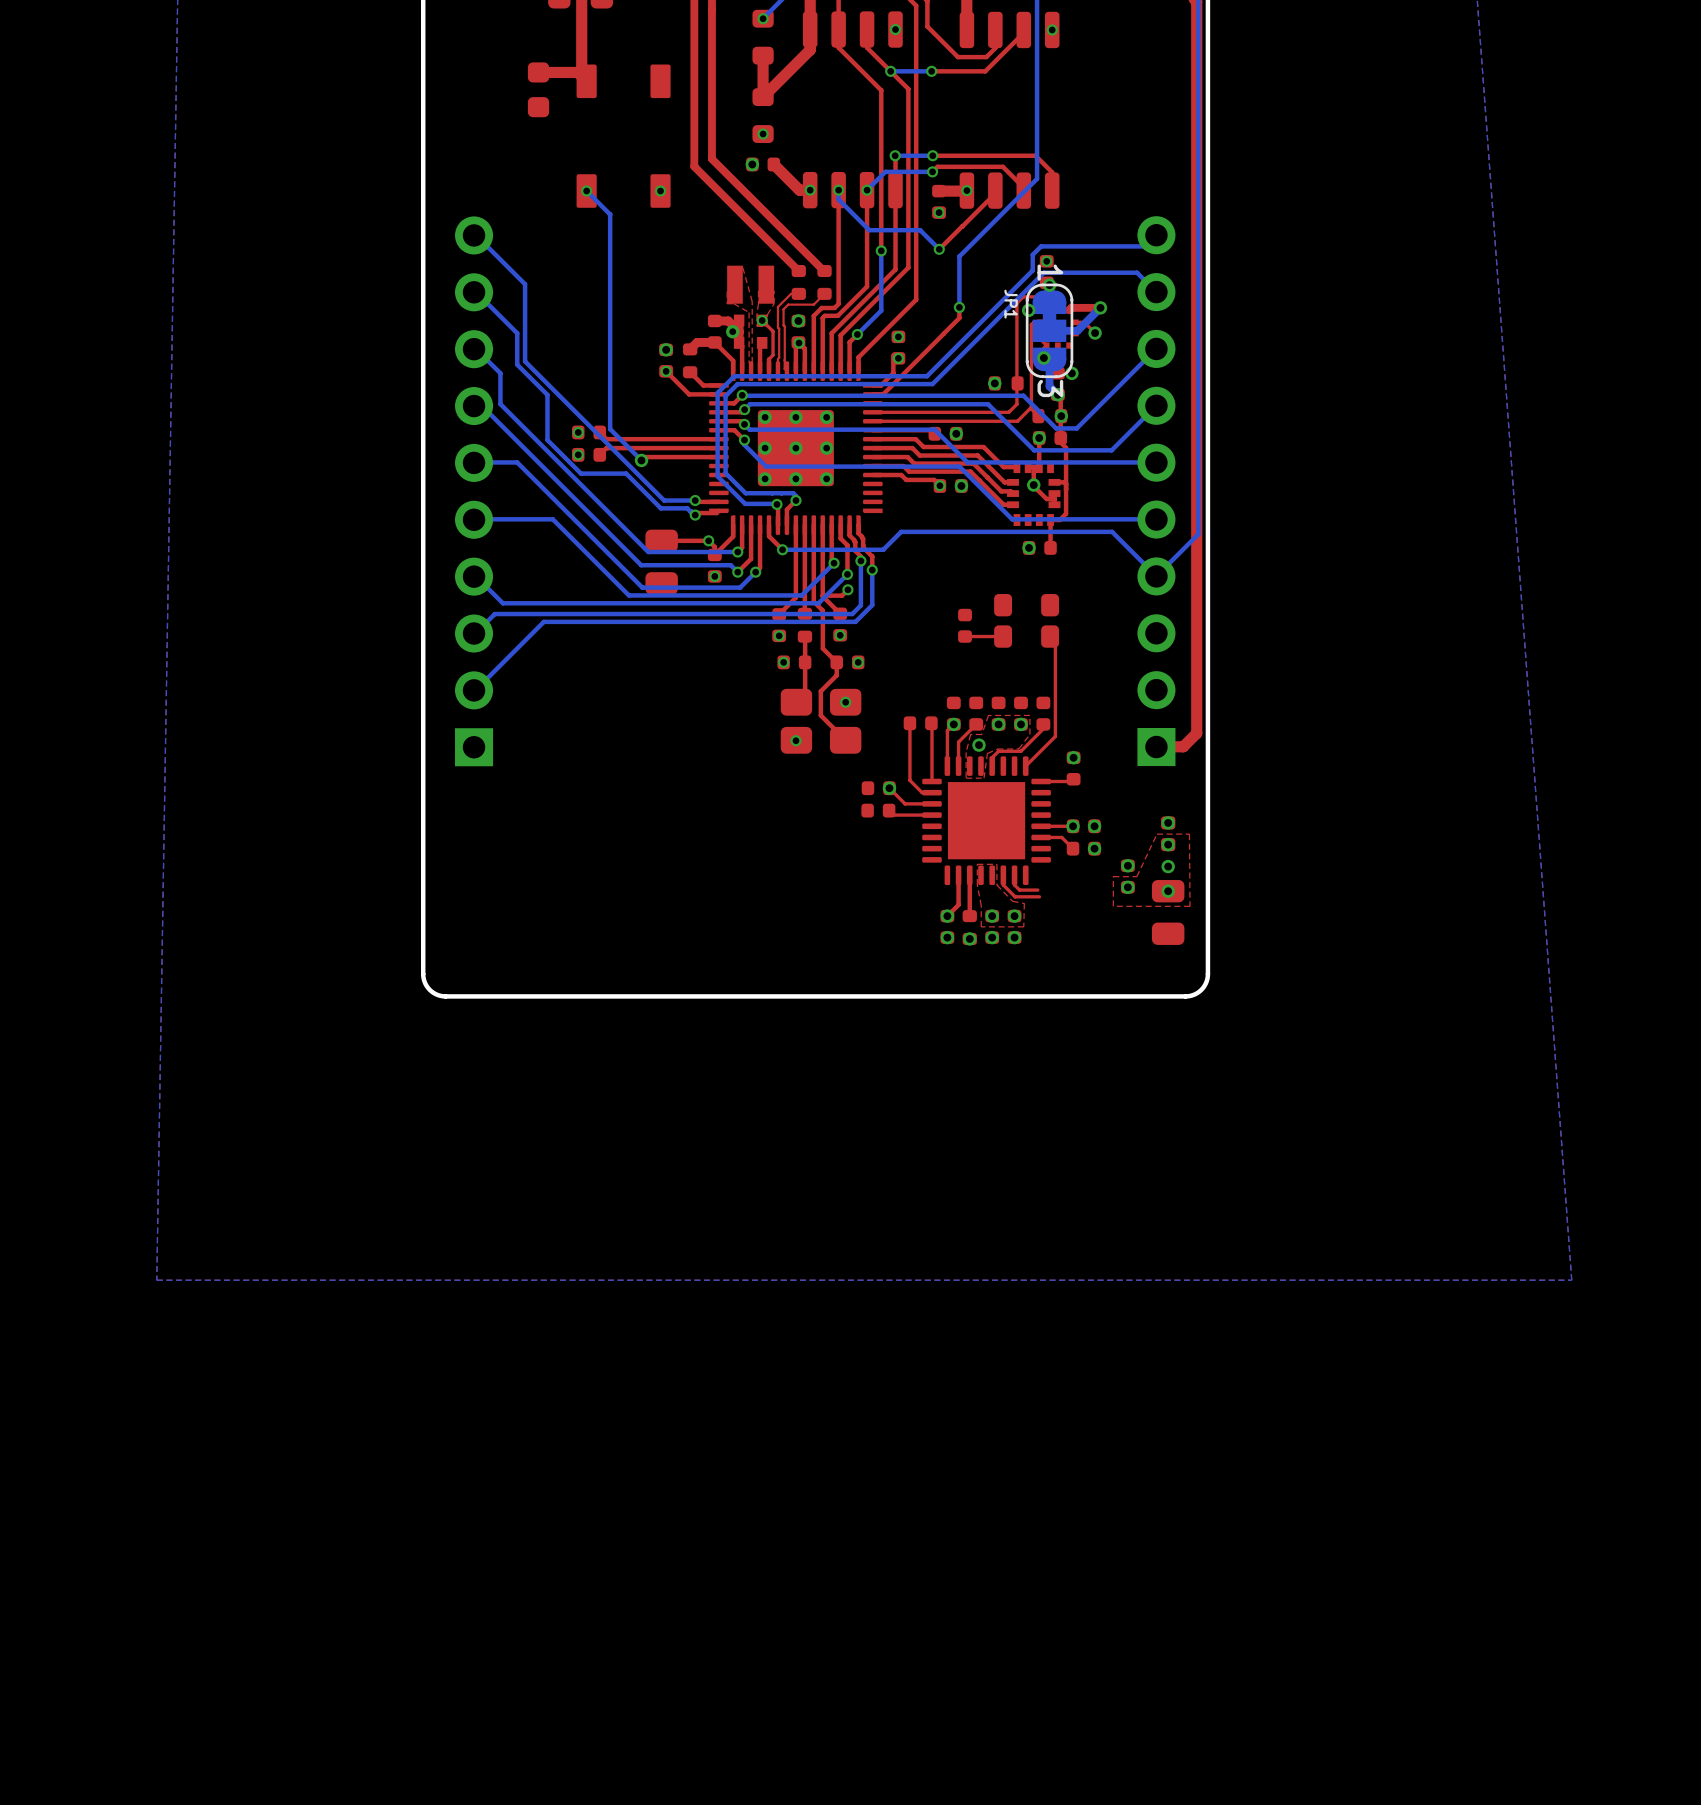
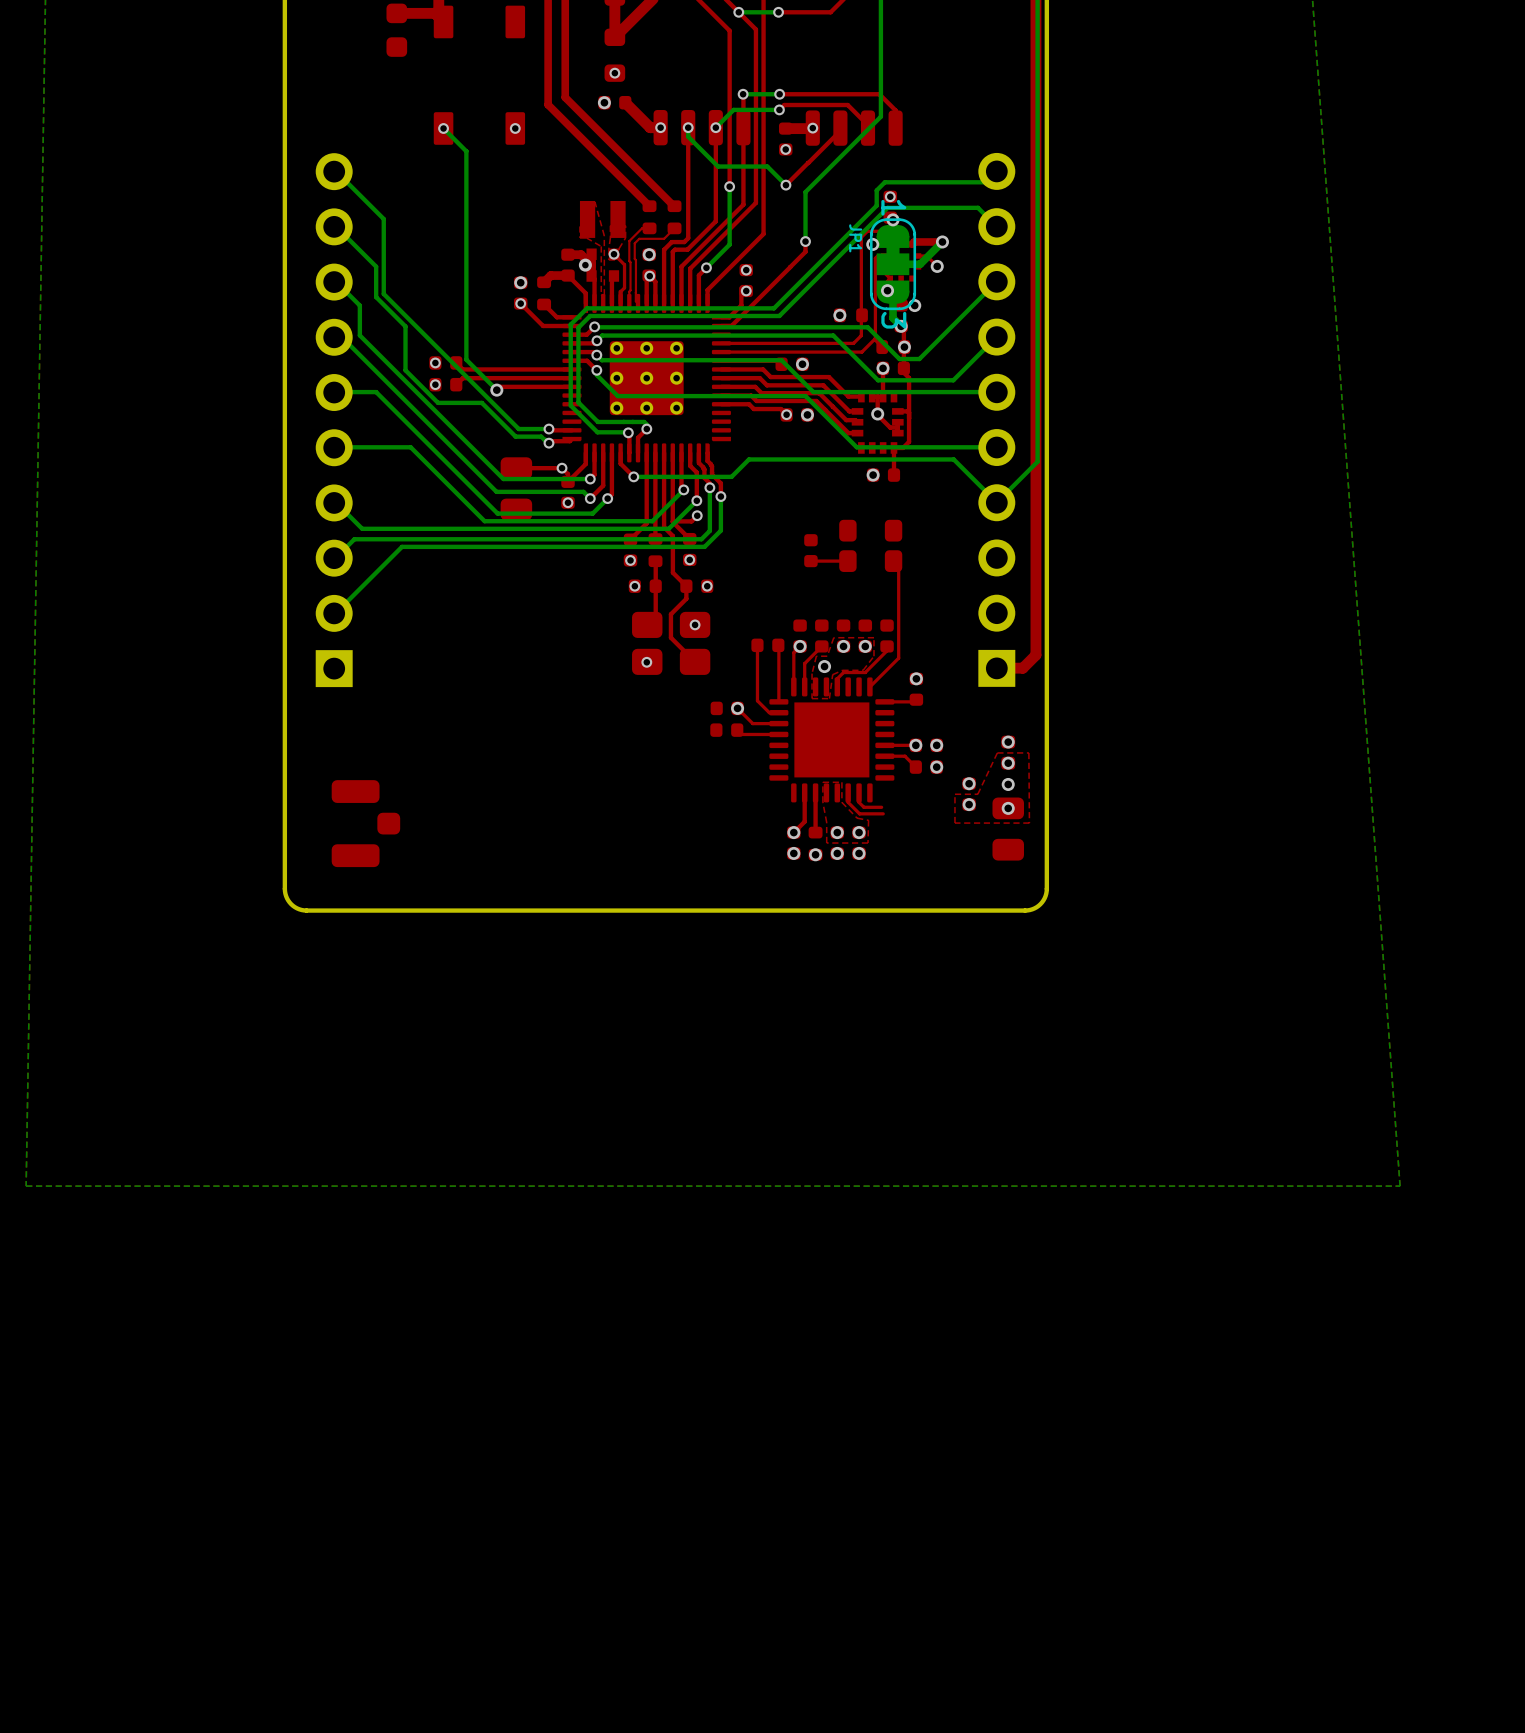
part: none -> (365, 823)

